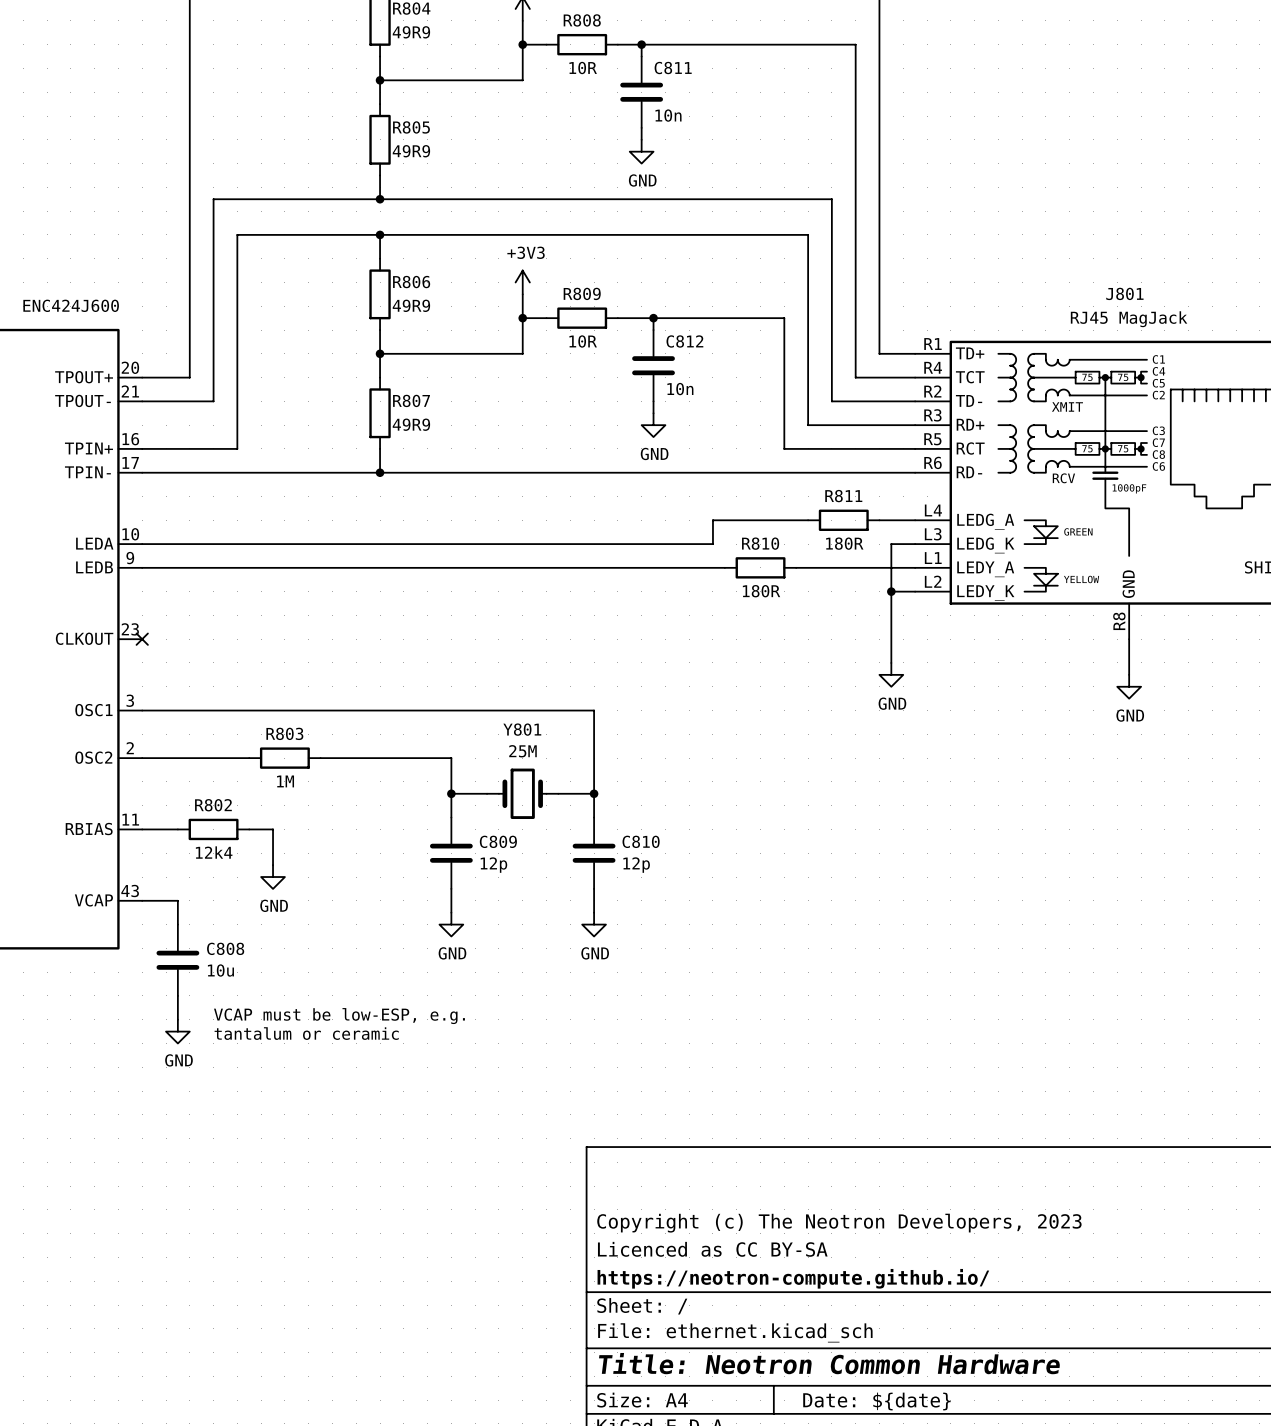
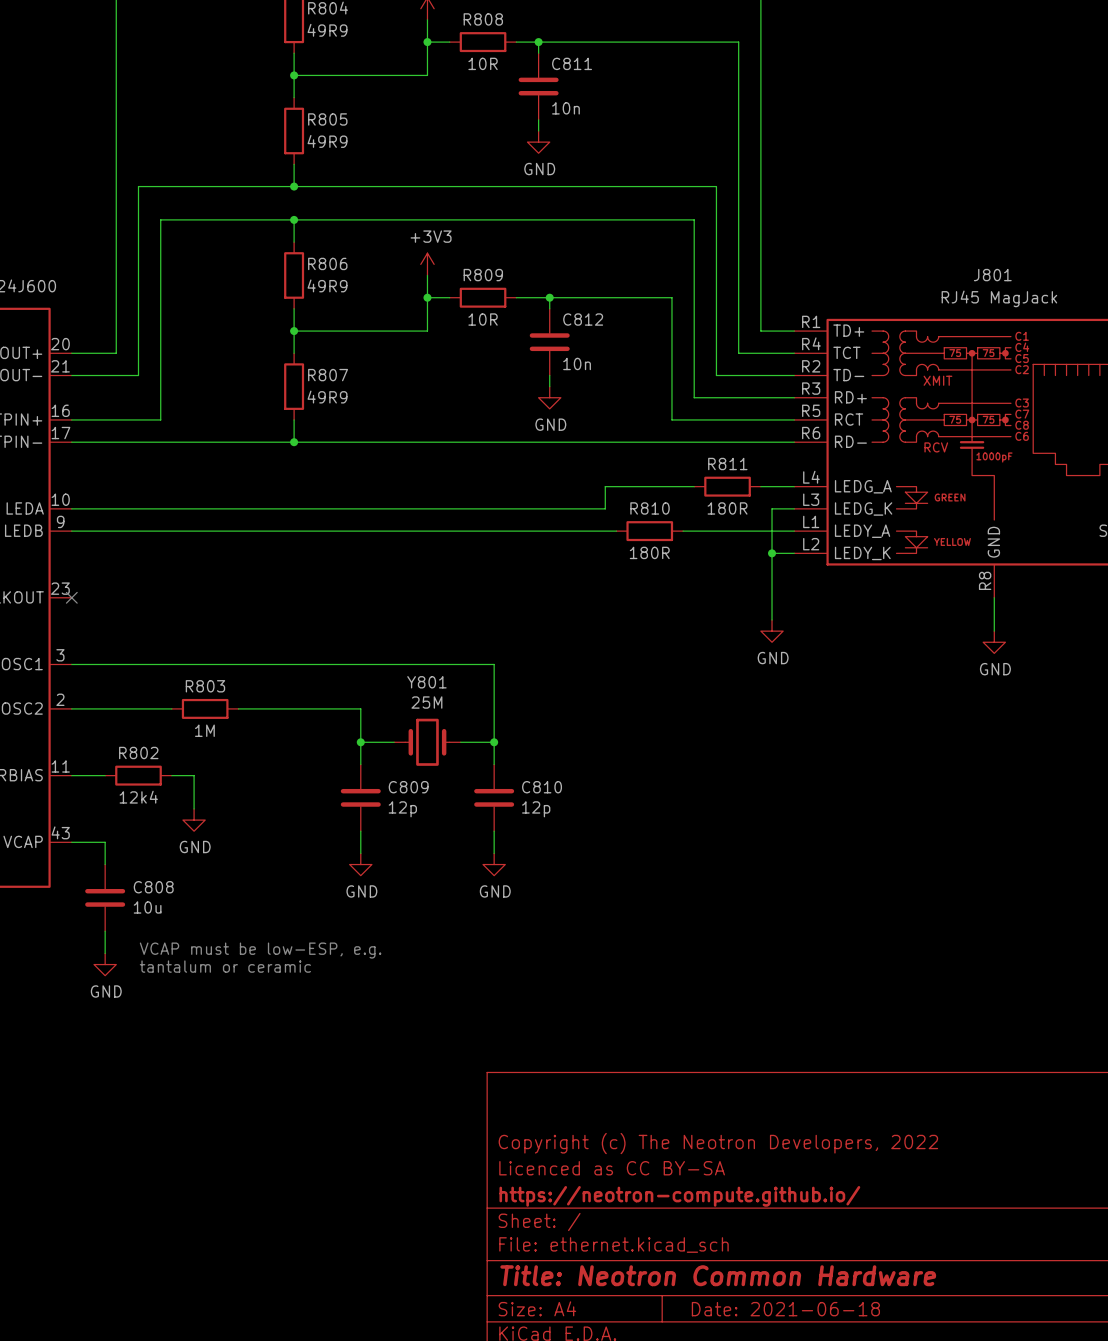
title block: Copyright (c) The Neotron Developers, 2023 (839, 1223) -> Copyright (c) The Neotron Developers, 2022 (718, 1143)
title block: Date: ${date} (876, 1401) -> Date: 2021-06-18 (785, 1309)

